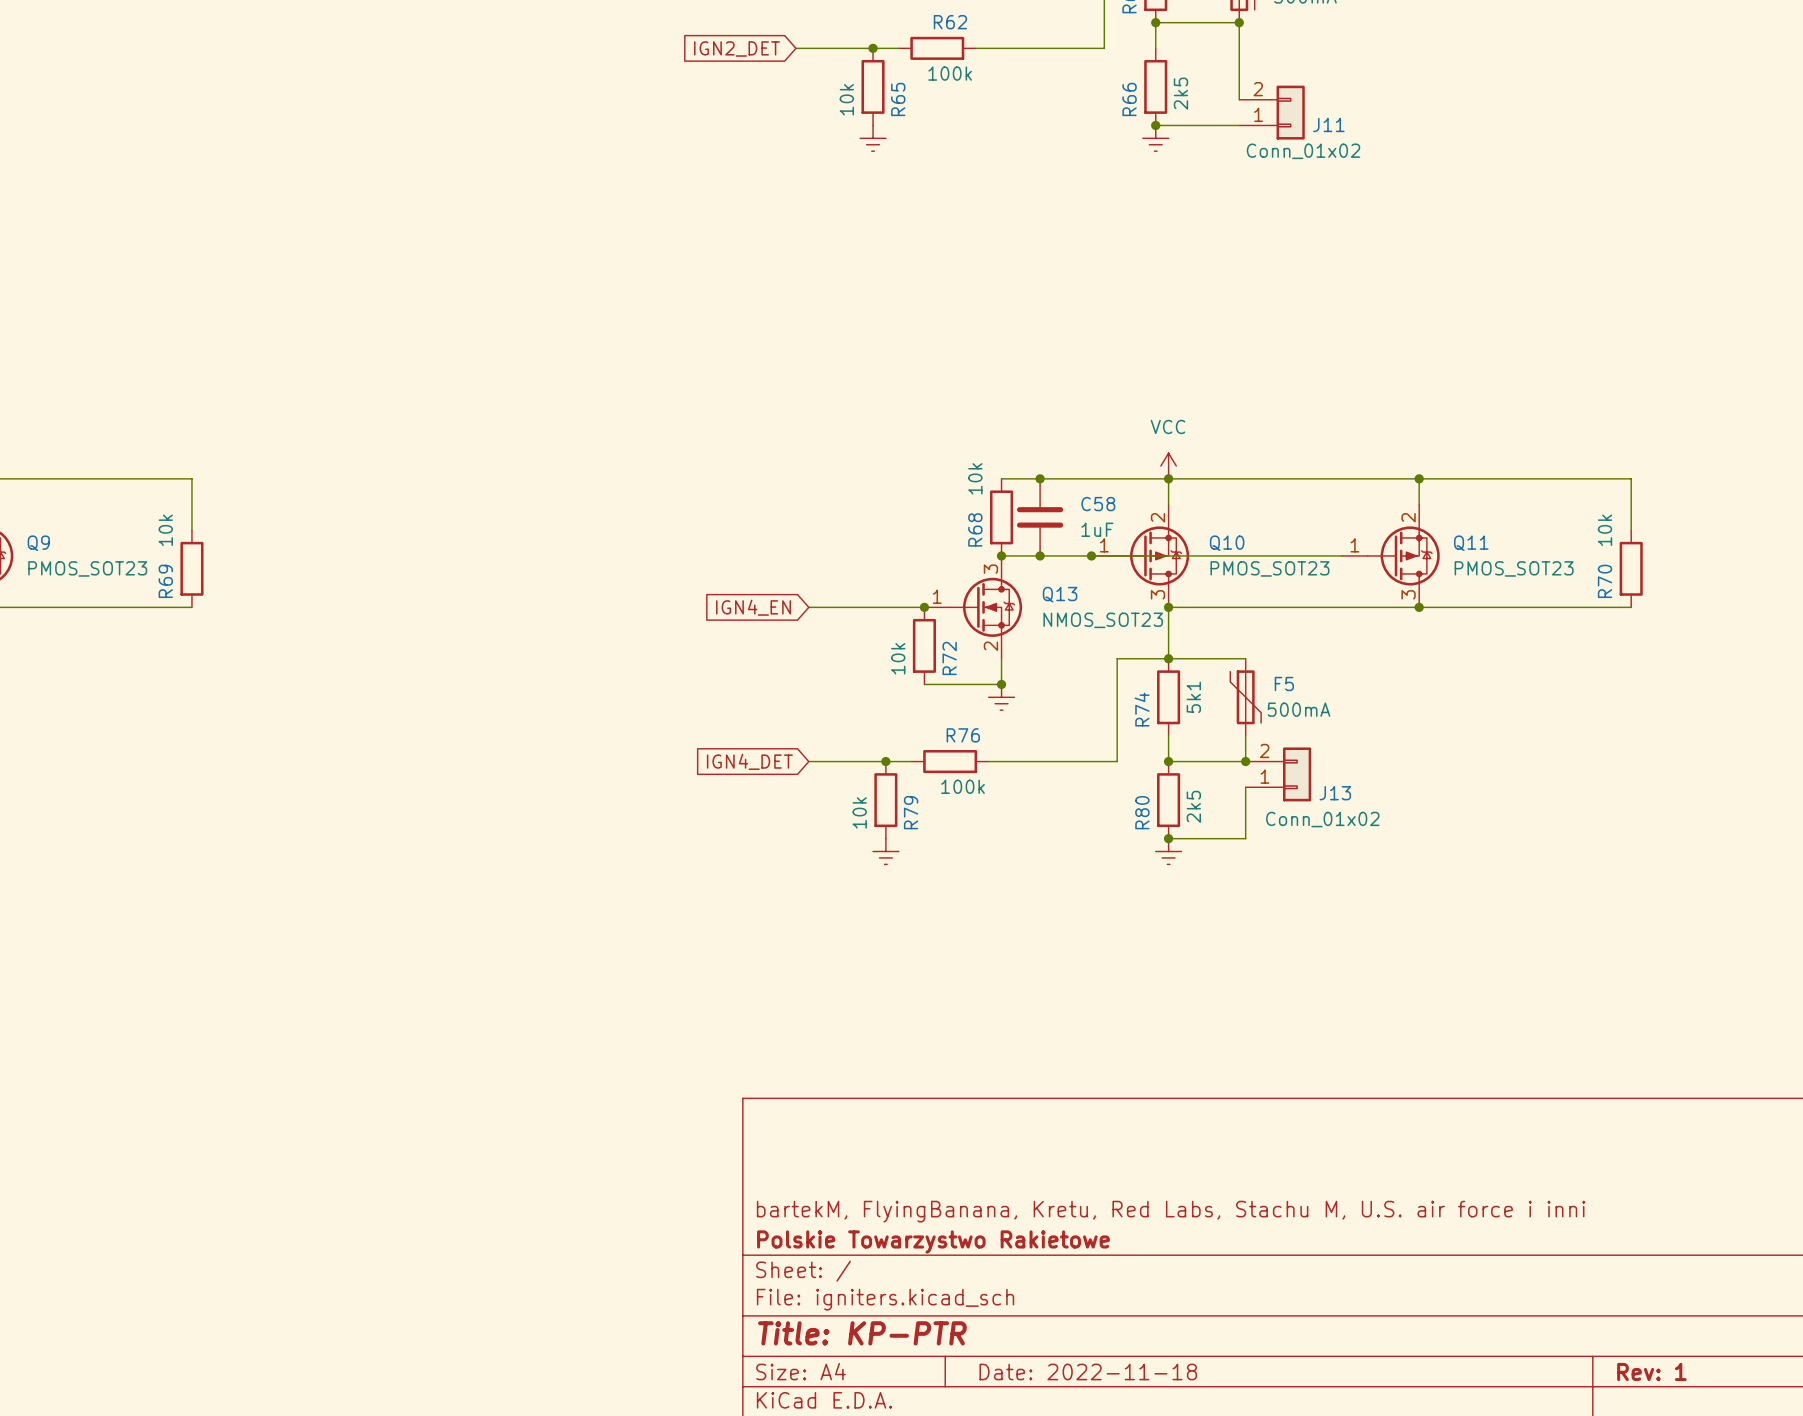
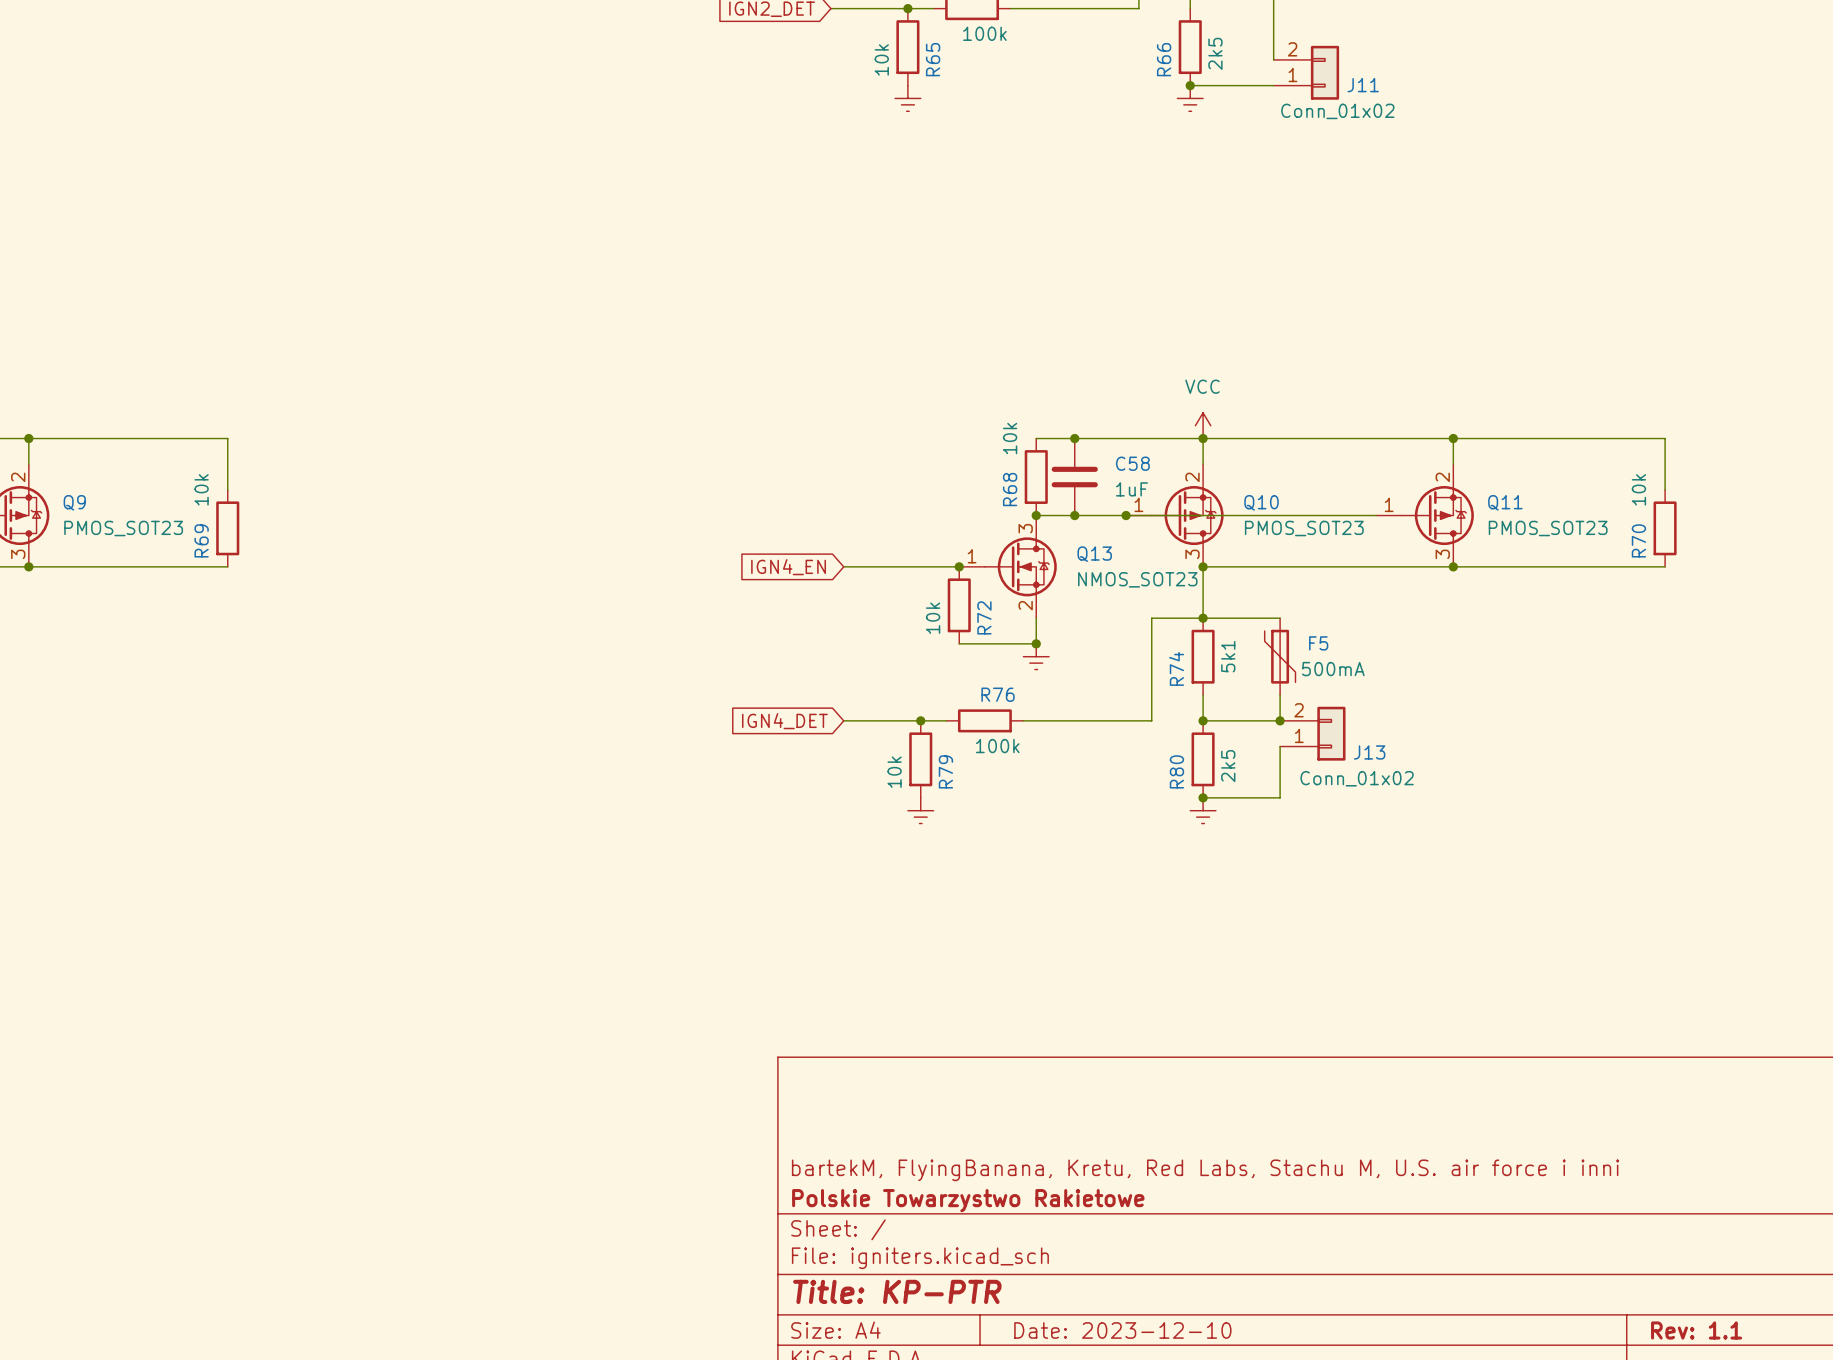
title block: Date: 2022-11-18 (1088, 1371) -> Date: 2023-12-10 (1122, 1330)
title block: Rev: 1 (1651, 1371) -> Rev: 1.1 (1696, 1330)

